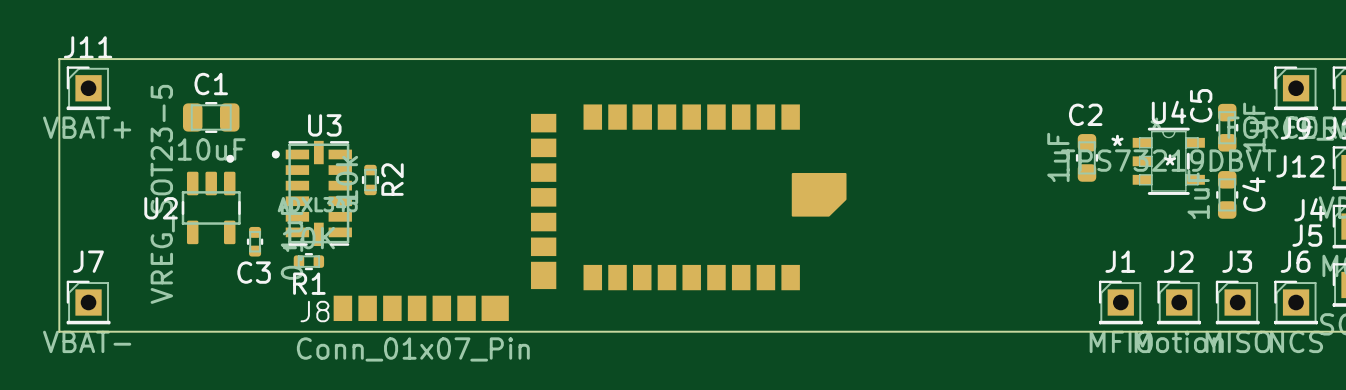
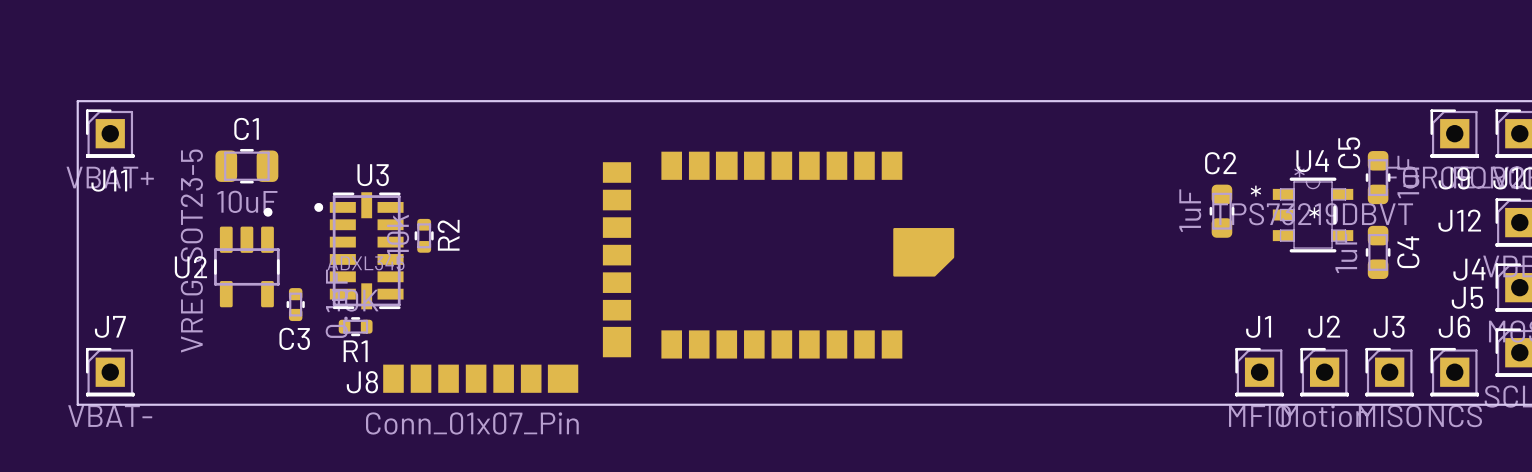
J11 name position: J11 (88, 47) -> J11 (109, 180)

